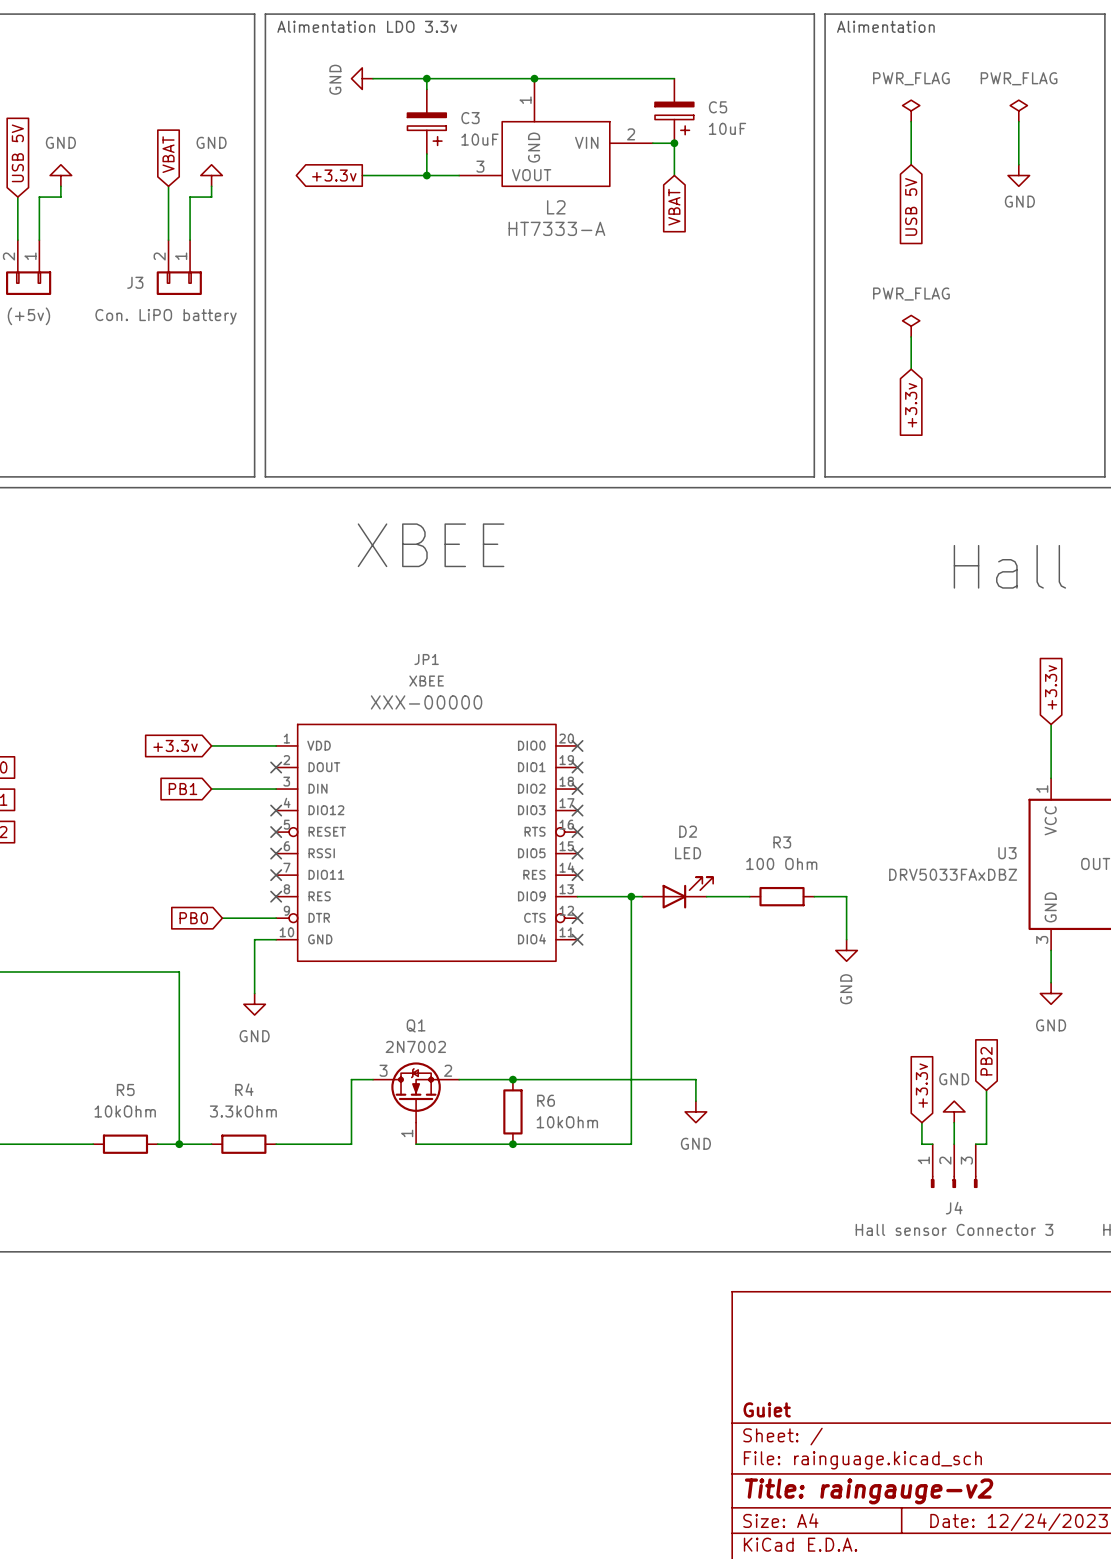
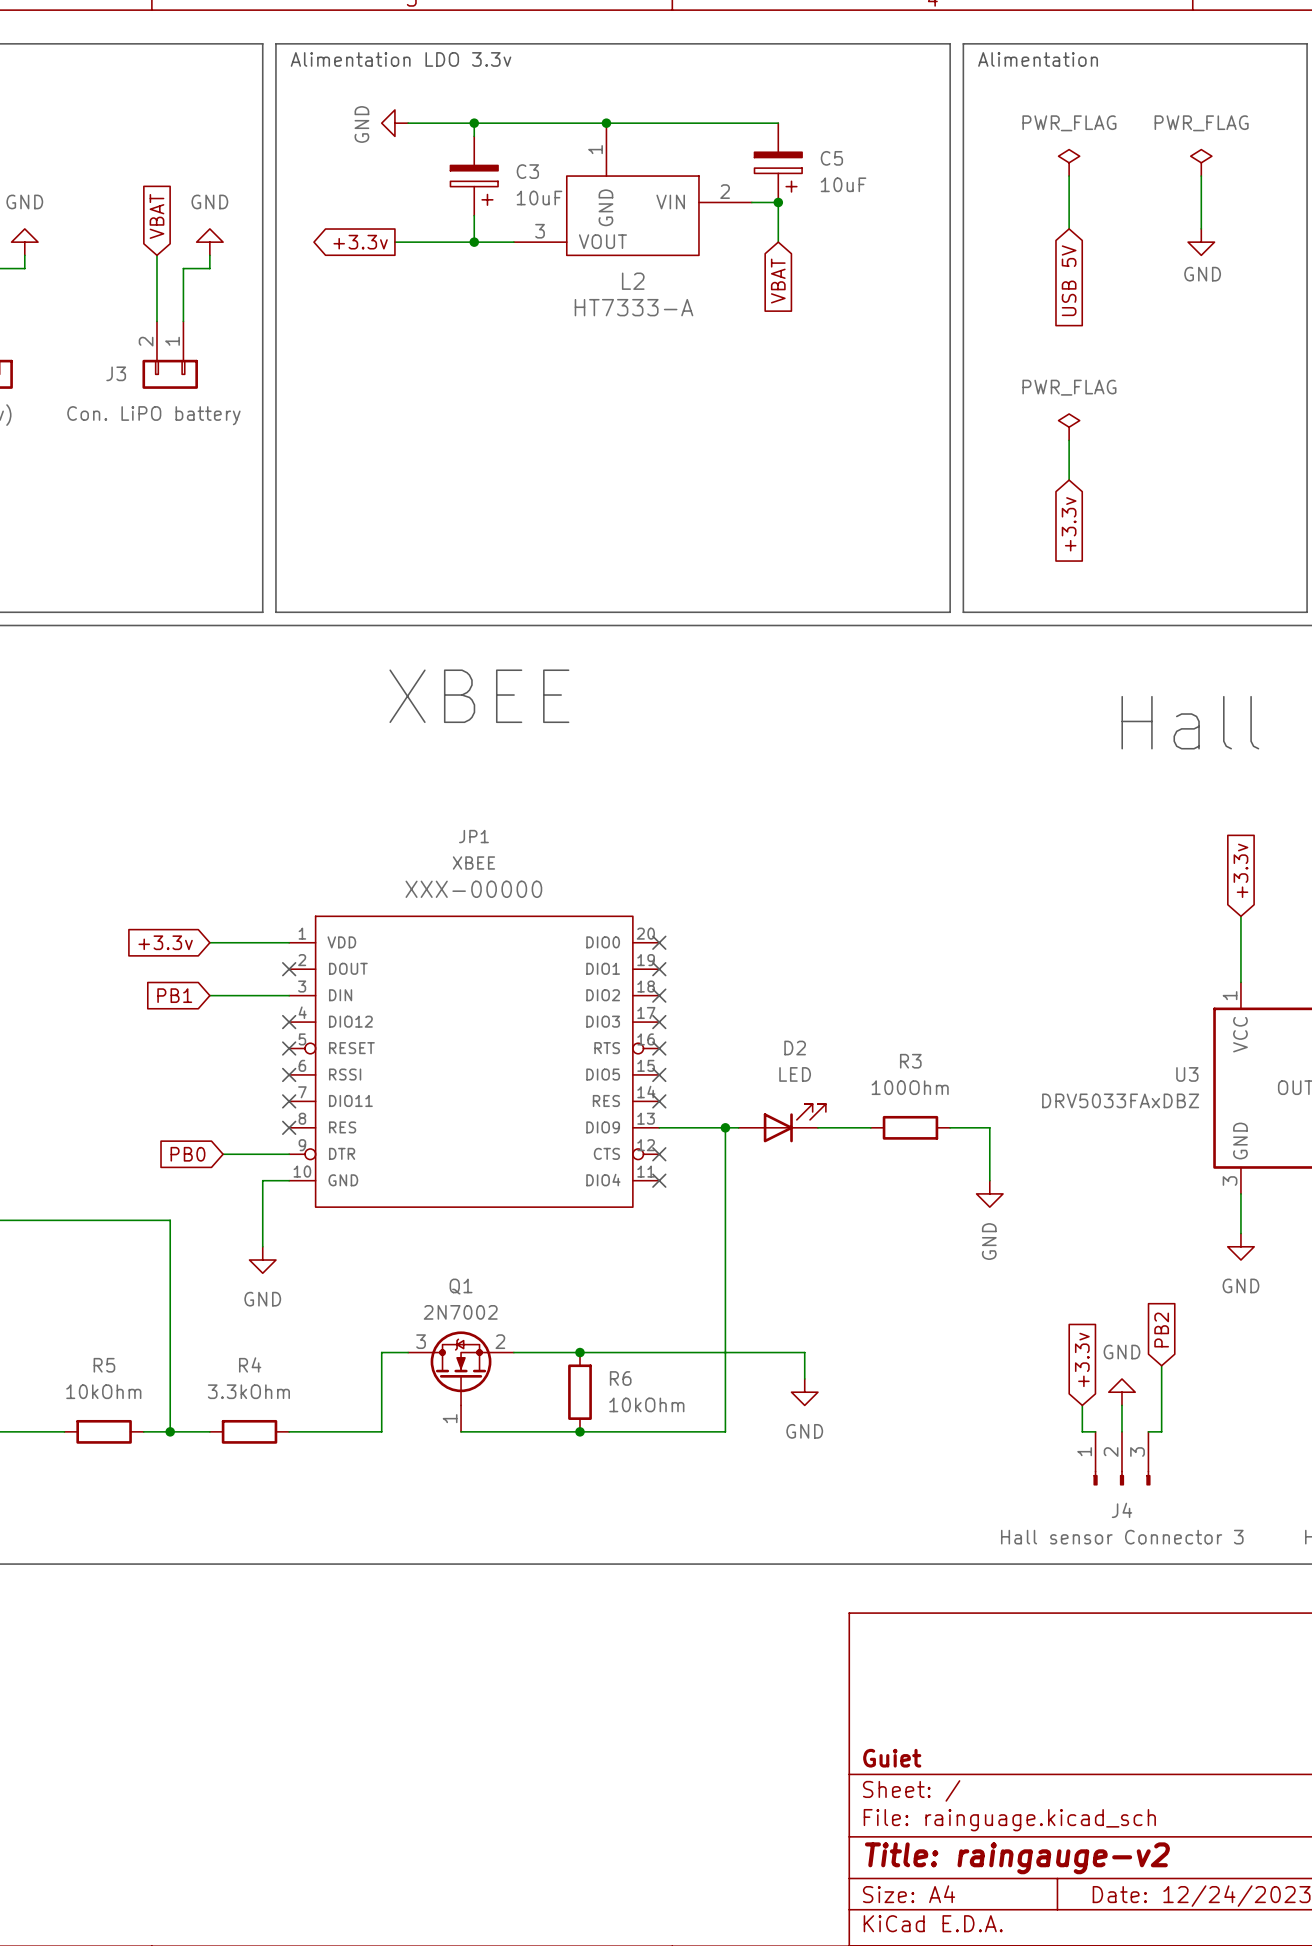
R3 value: 100 Ohm (781, 863) -> 100Ohm (910, 1087)

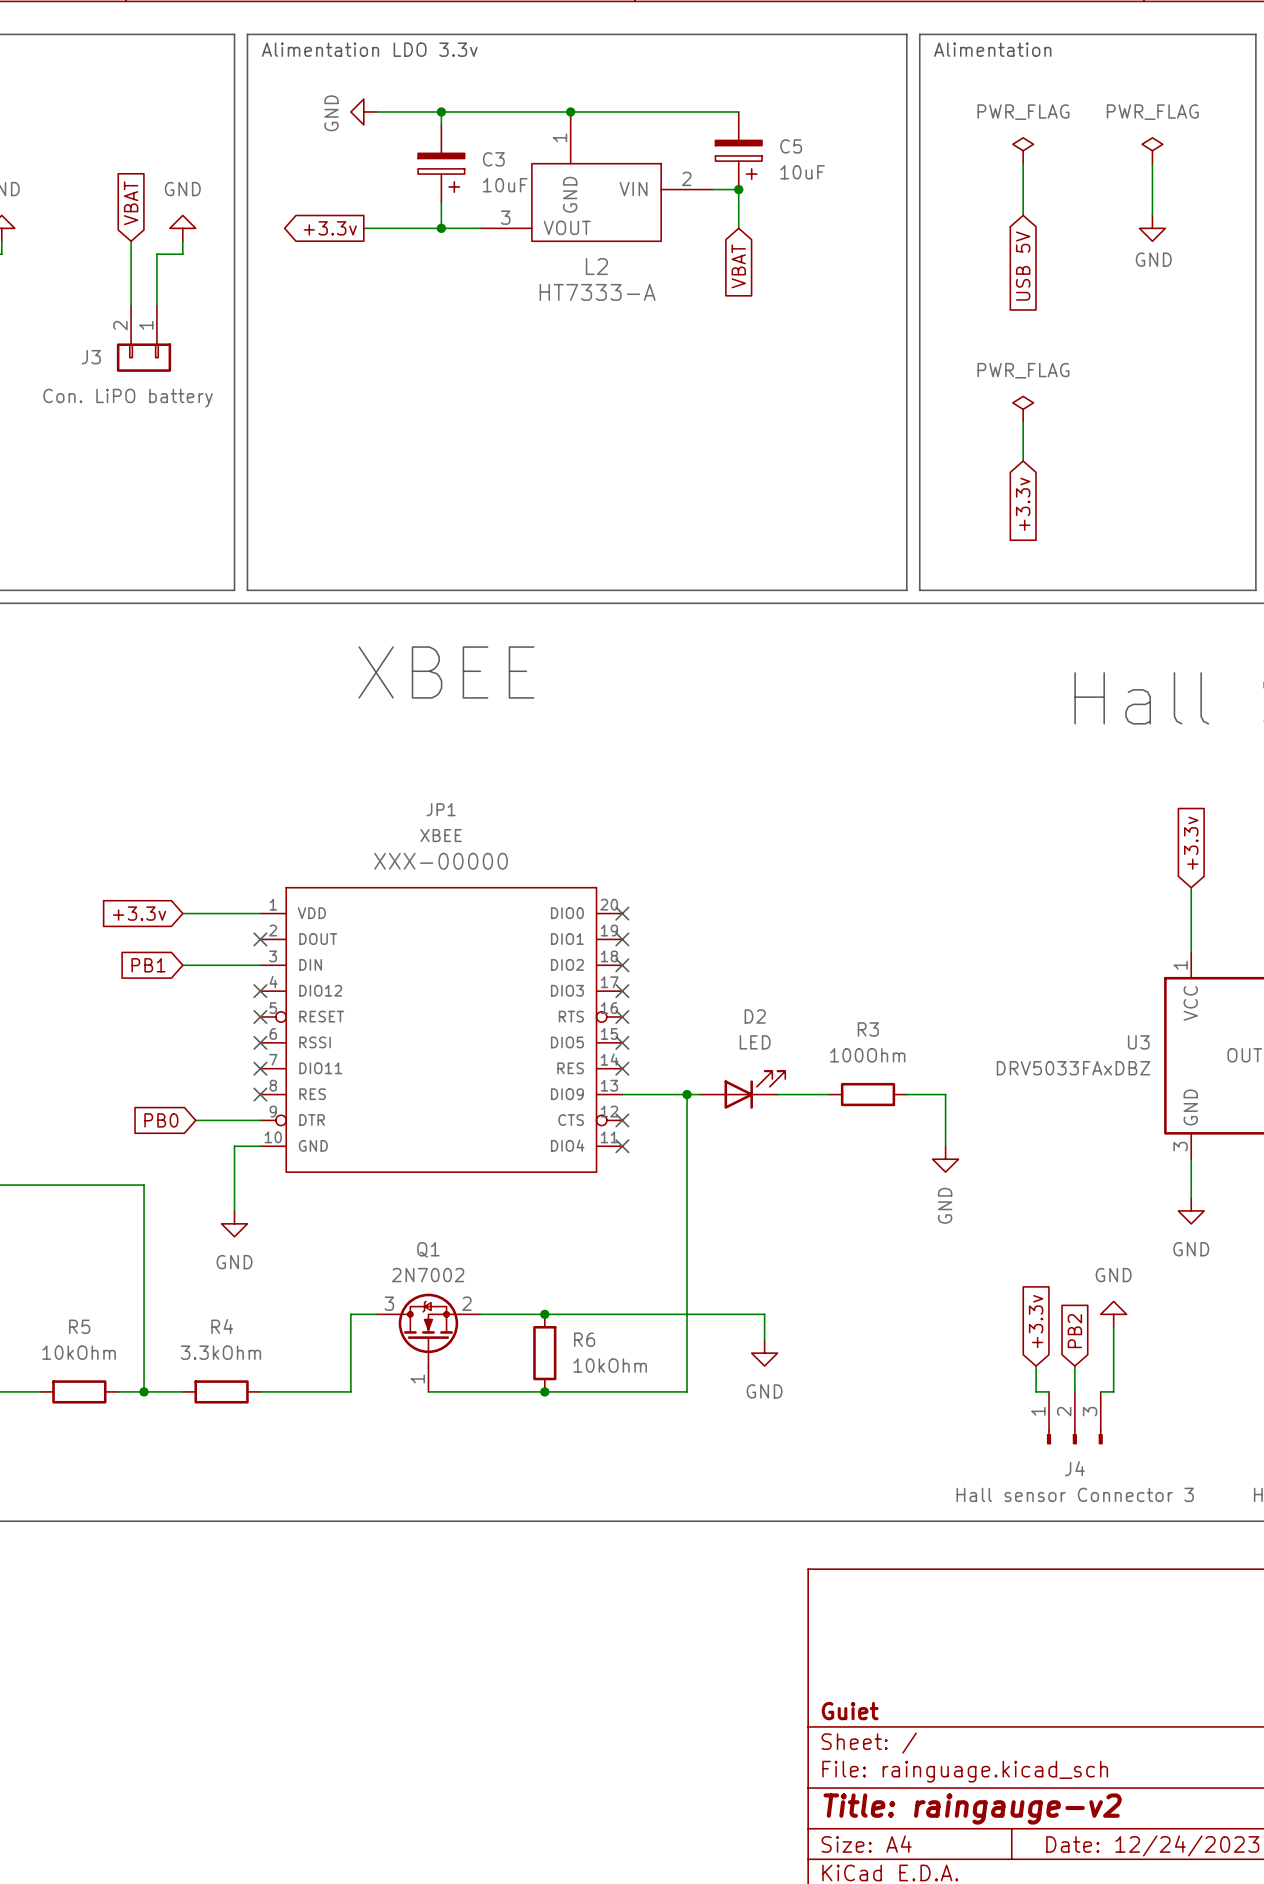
global label position: PB2 (1161, 1330) -> PB2 (1074, 1331)
power symbol position: GND (1121, 1392) -> GND (1113, 1314)

